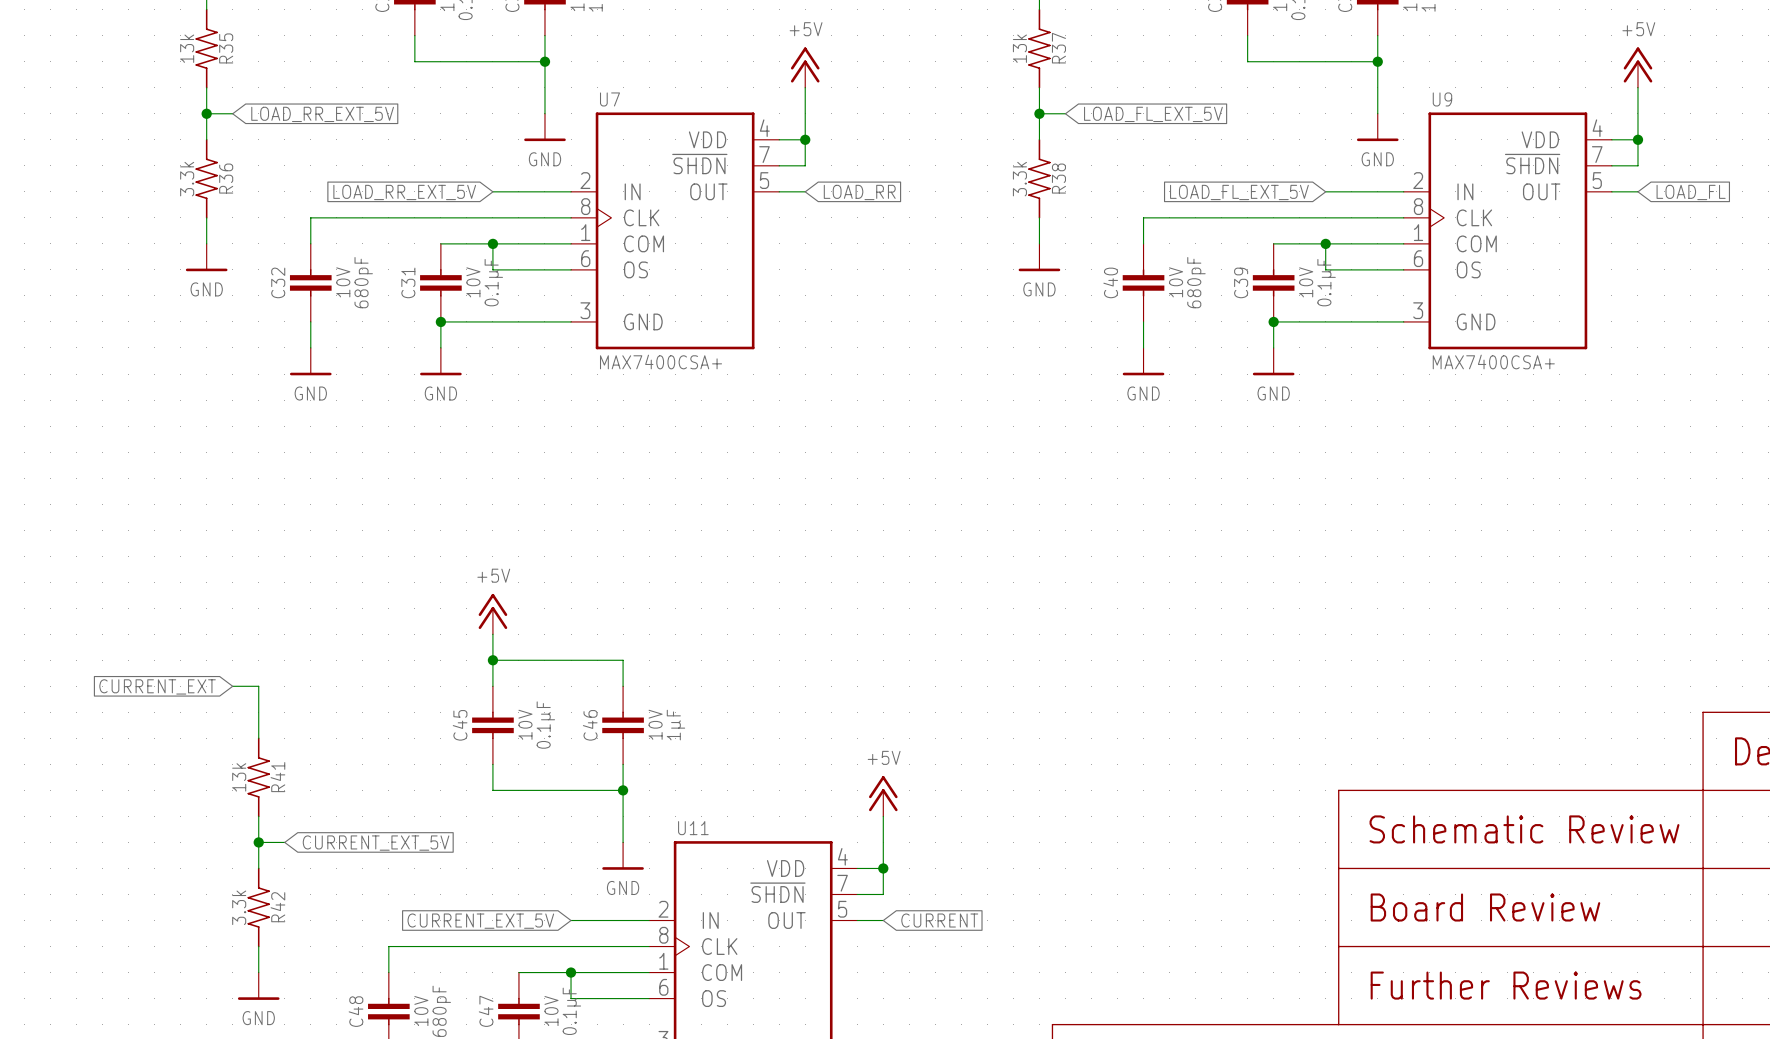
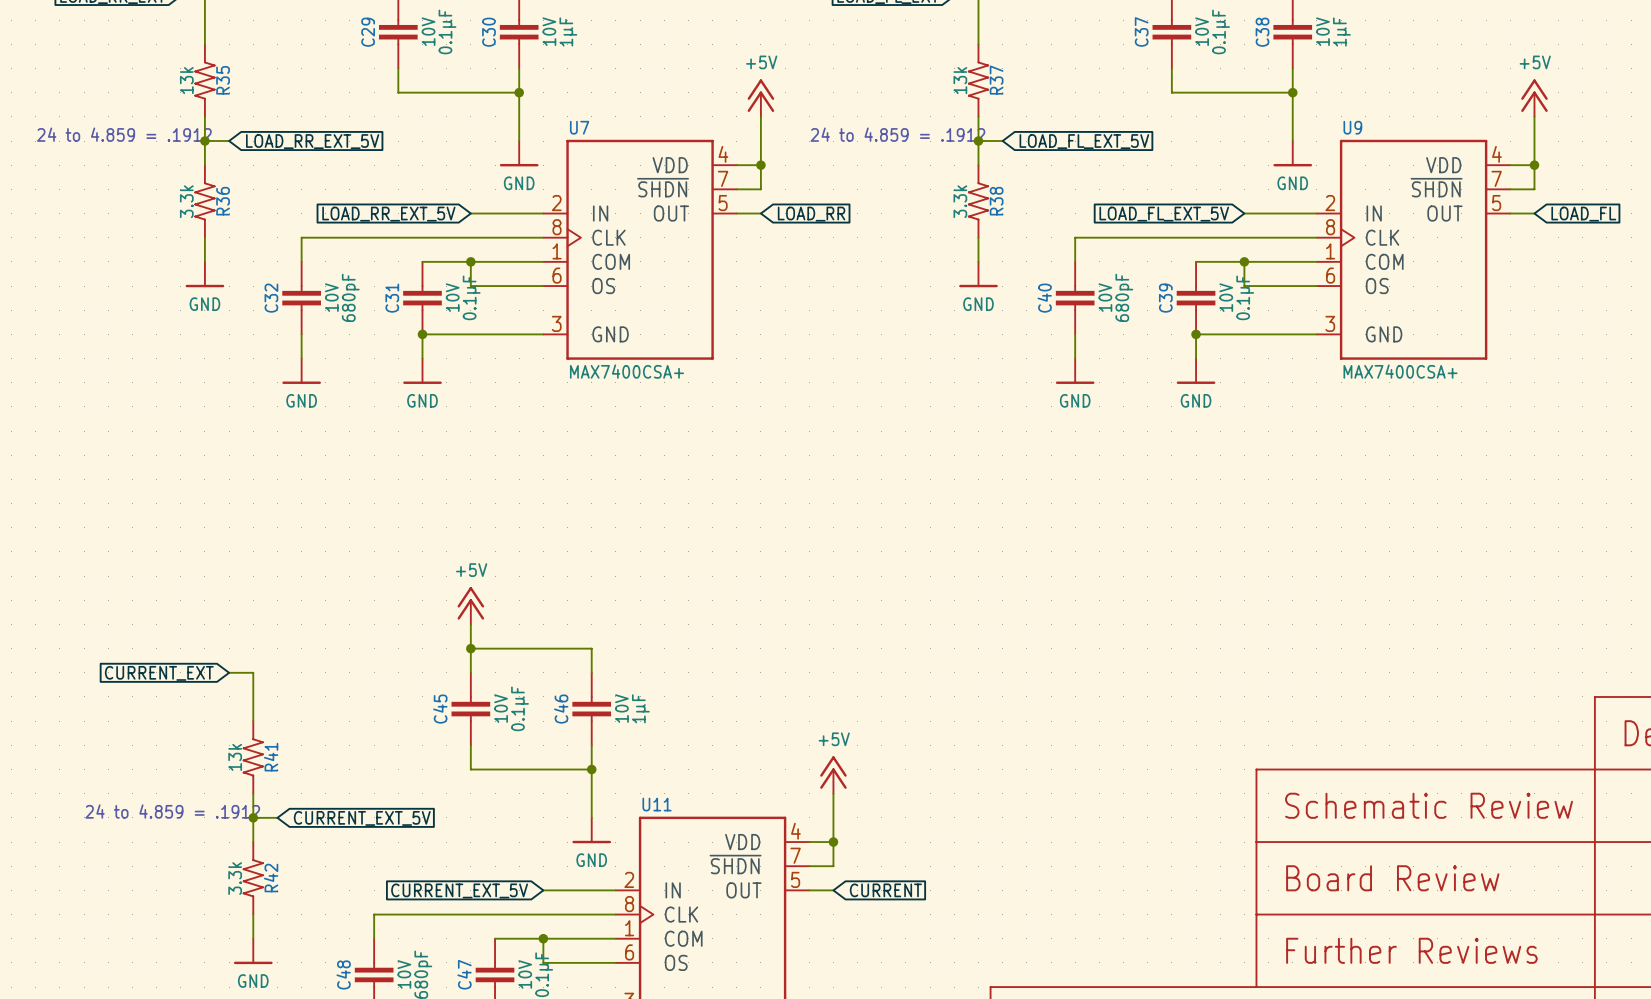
text: none -> 24 to 4.859 = .1912 (124, 134)
text: none -> 24 to 4.859 = .1912 (897, 134)
text: none -> 24 to 4.859 = .1912 (172, 811)

